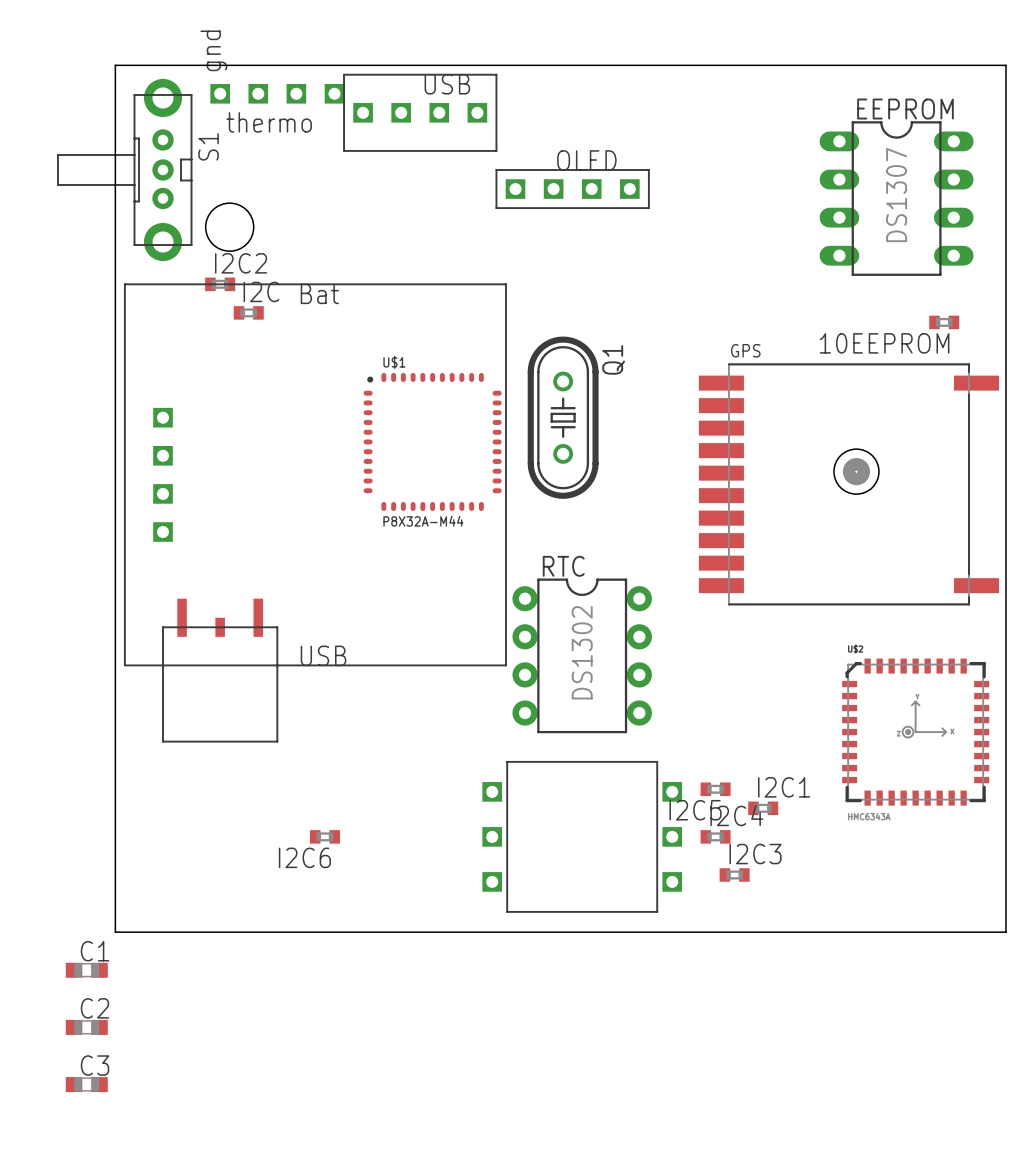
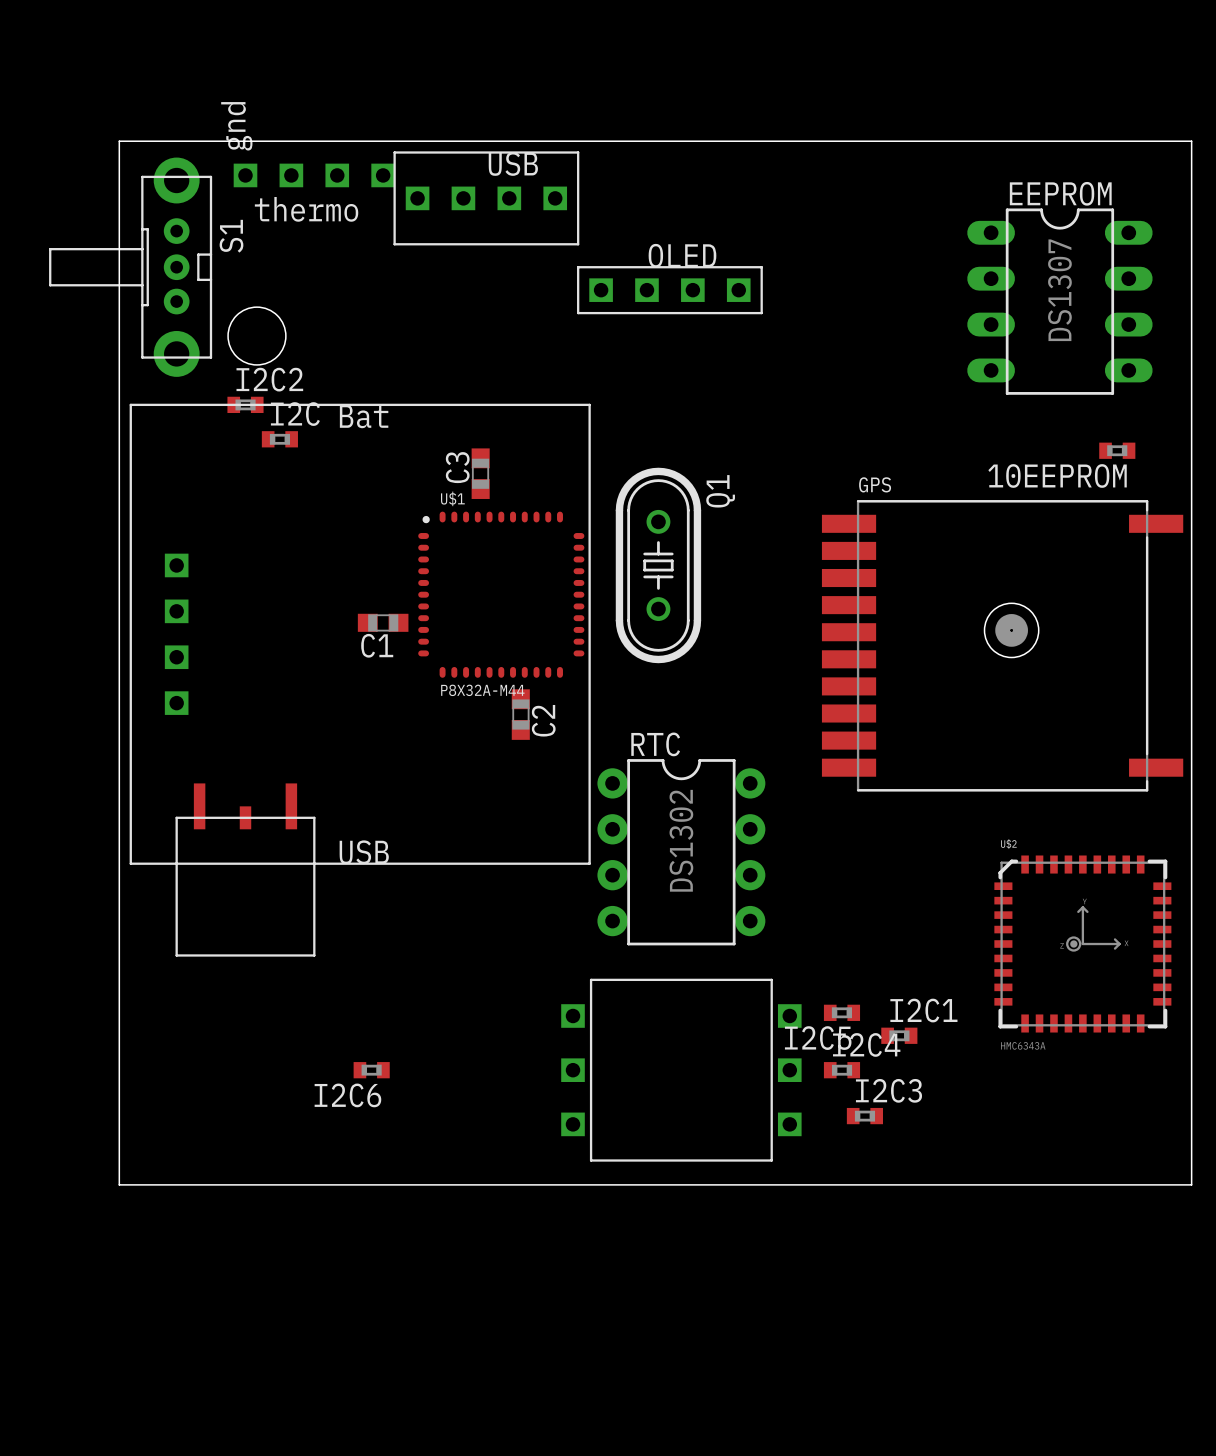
C1 name position: C1 (95, 951) -> C1 (377, 645)
C1 position: (86, 970) -> (383, 622)
C2 rotation: 0° (86, 1027) -> 90° clockwise (520, 714)
C2 position: (86, 1027) -> (520, 714)
C3 name position: C3 (95, 1065) -> C3 (457, 467)
C3 rotation: 0° (86, 1084) -> 90° clockwise (480, 473)
C3 position: (86, 1084) -> (480, 473)

